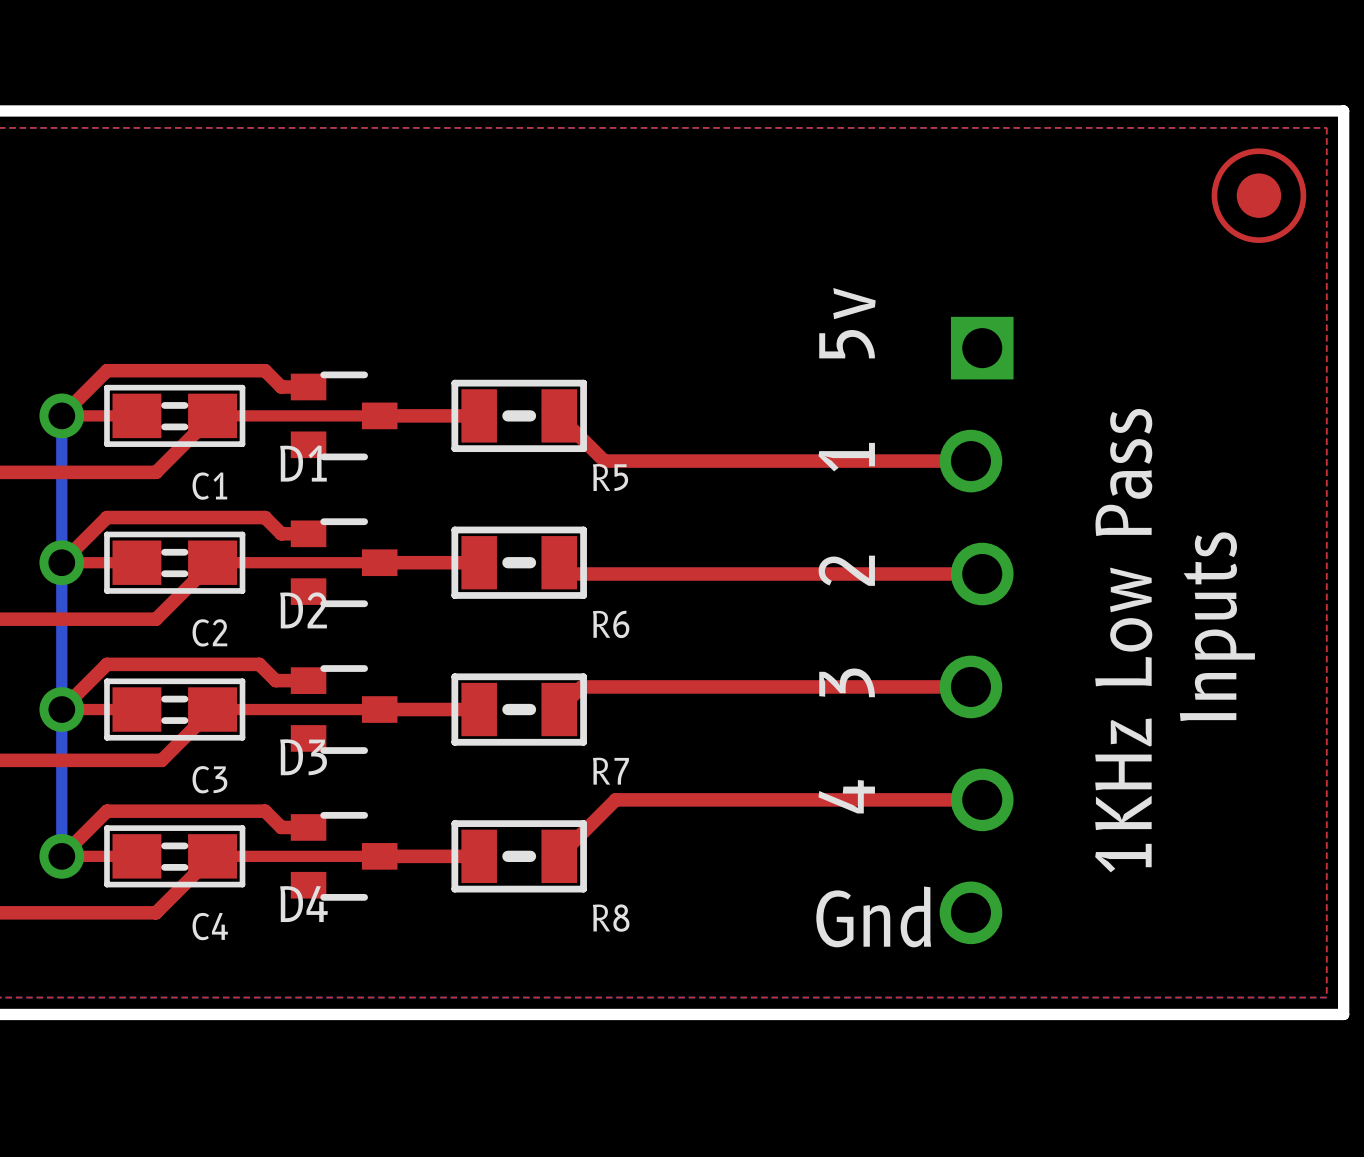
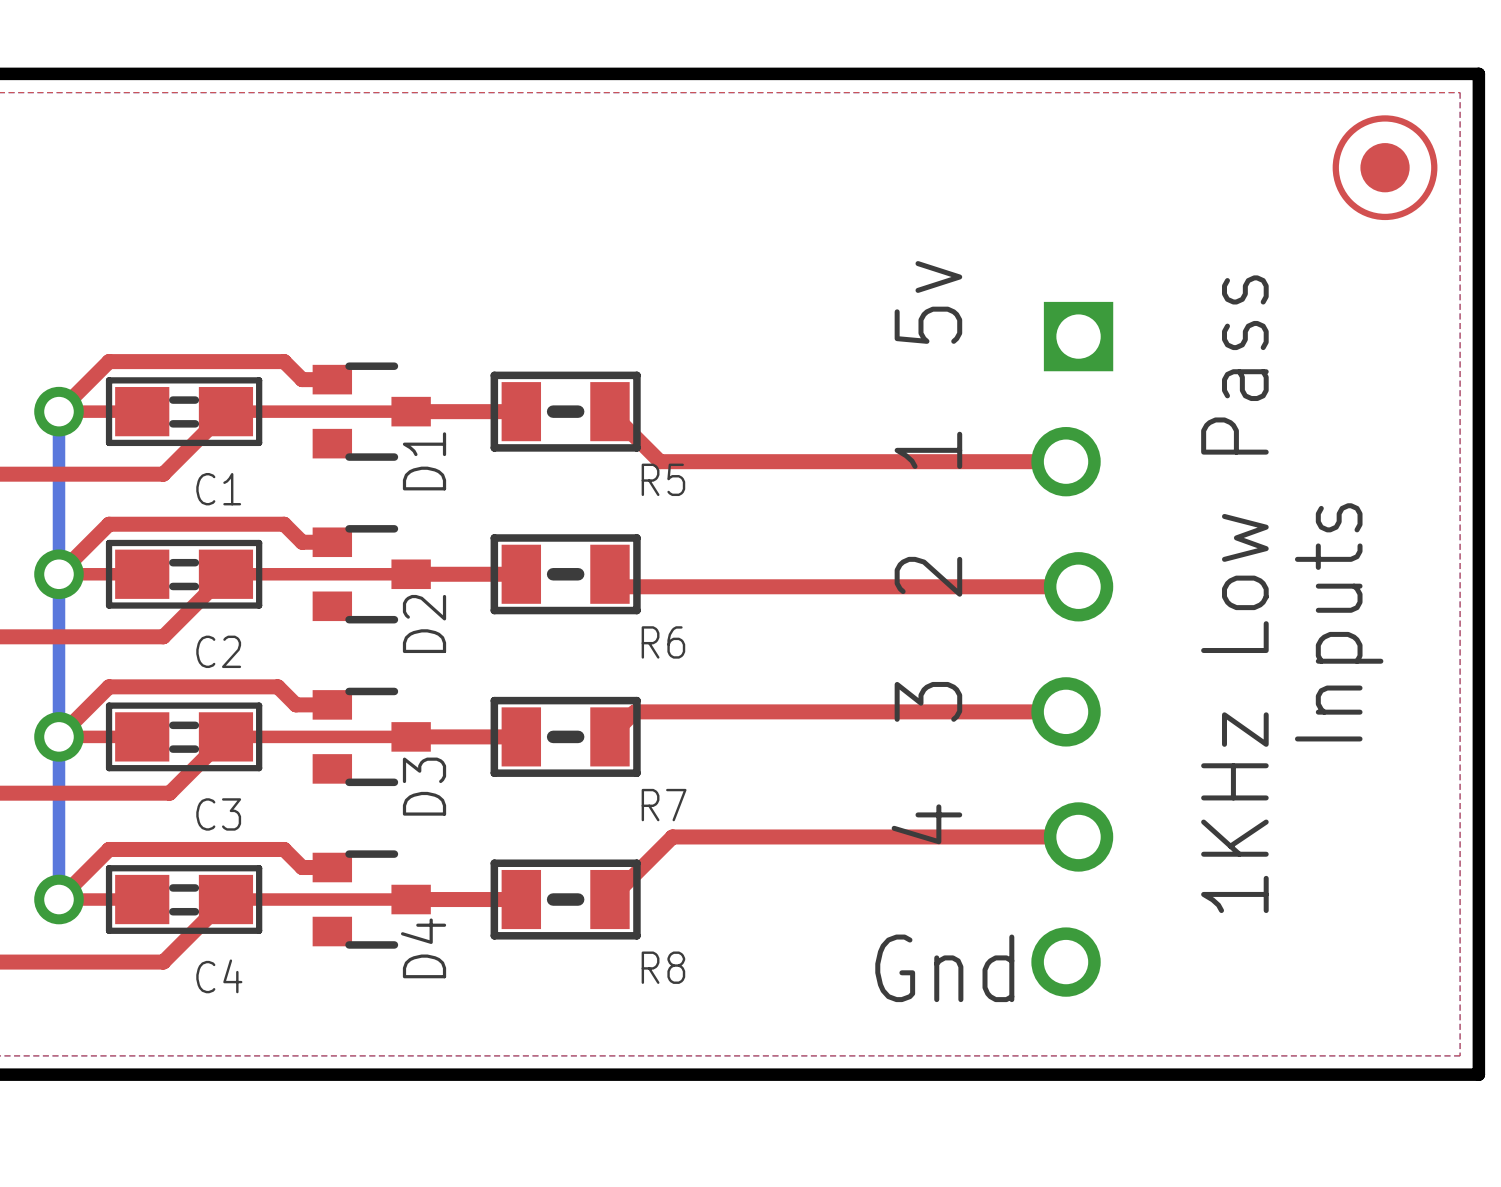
D1 name rotation: 0° (303, 463) -> 90° counterclockwise (424, 461)
D1 name position: D1 (303, 463) -> D1 (424, 461)
D2 name rotation: 0° (303, 610) -> 90° counterclockwise (424, 623)
D2 name position: D2 (303, 610) -> D2 (424, 623)
D3 name rotation: 0° (303, 757) -> 90° counterclockwise (424, 786)
D3 name position: D3 (303, 757) -> D3 (424, 786)
D4 name rotation: 0° (304, 903) -> 90° counterclockwise (423, 948)
D4 name position: D4 (304, 903) -> D4 (423, 948)

